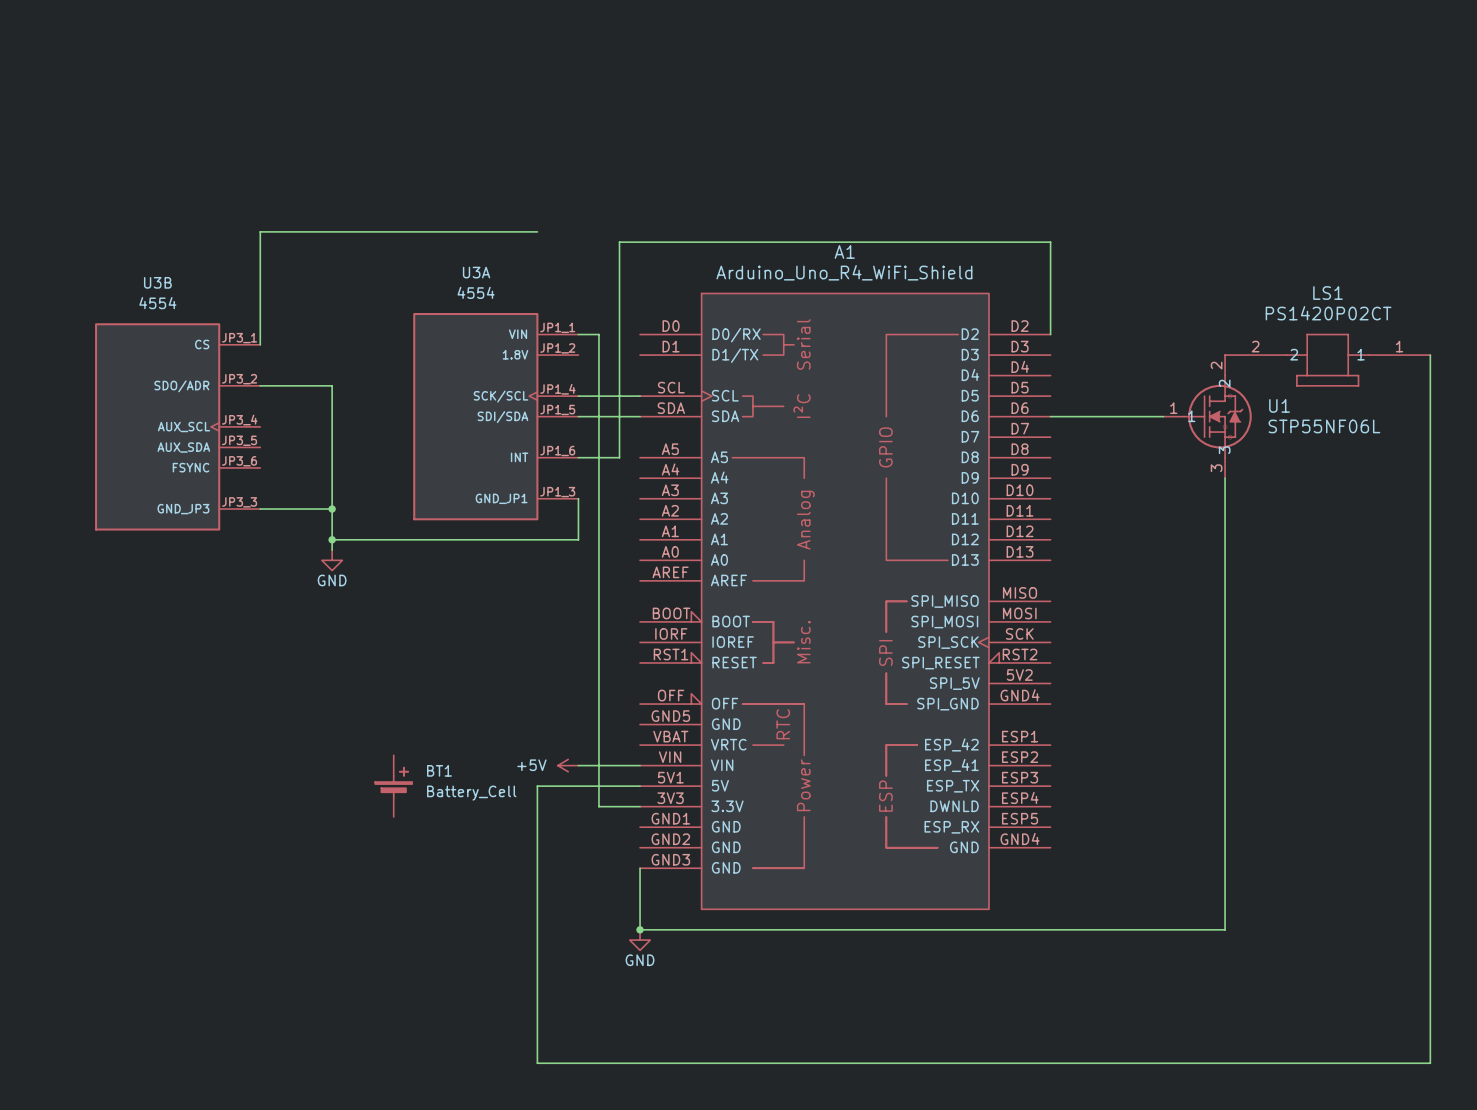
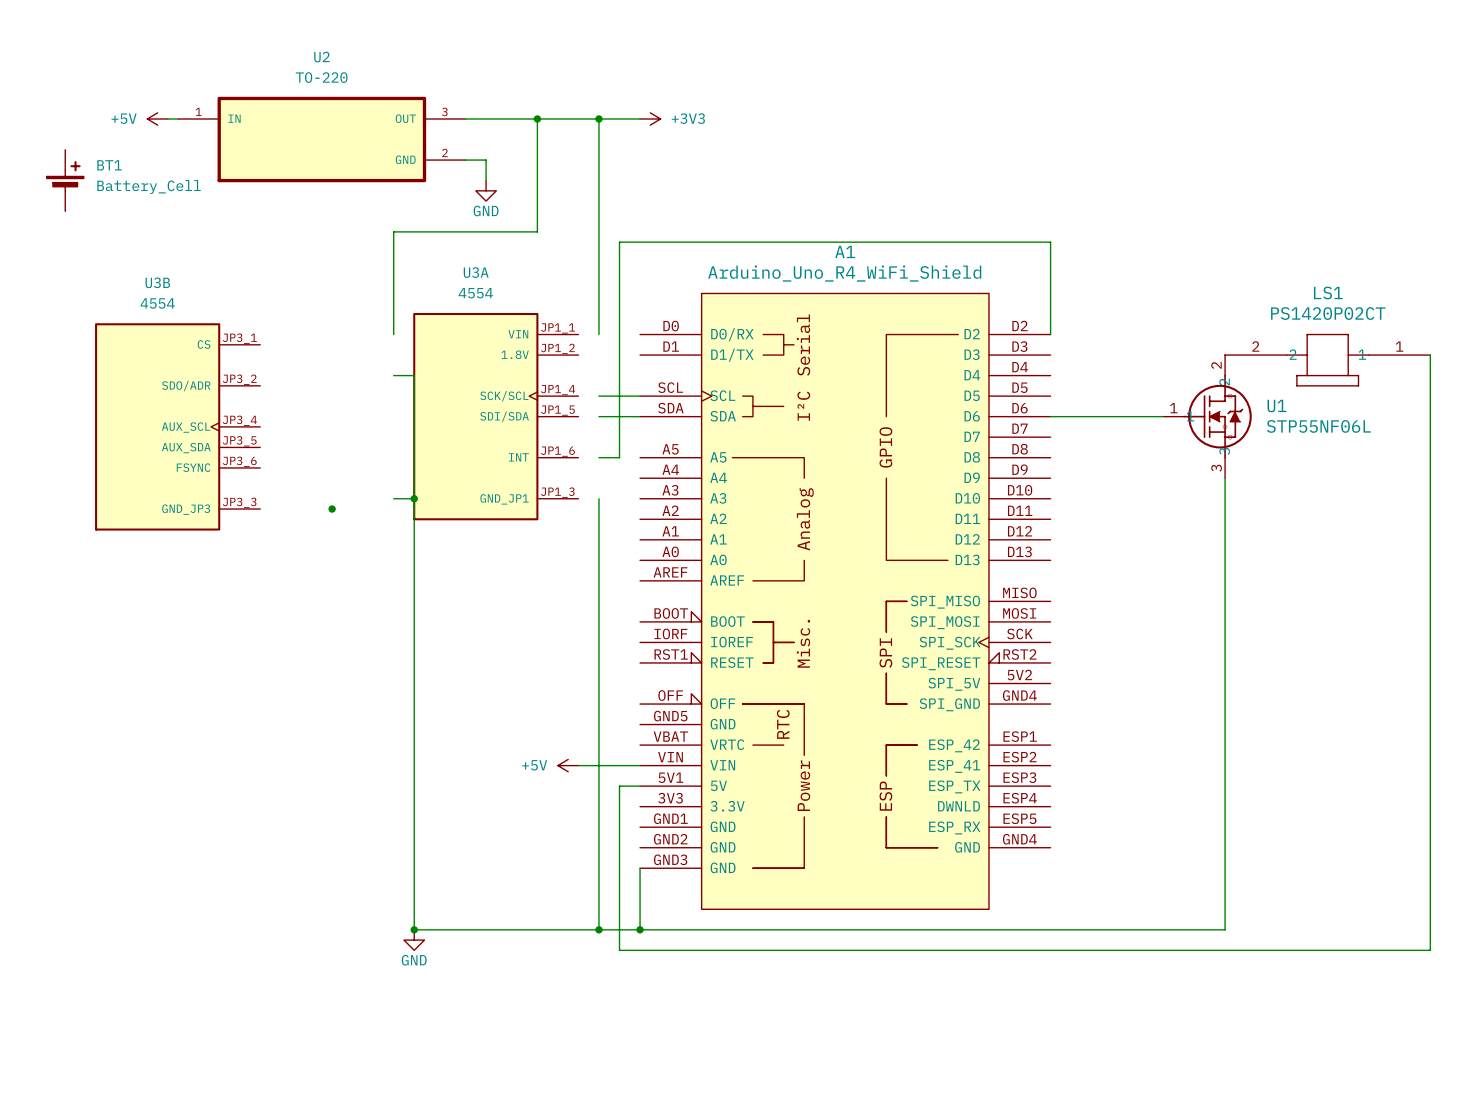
power symbol: none -> +5V (157, 119)
wire: none -> (167, 119) (178, 119)
wire: none -> (465, 119) (640, 119)
wire: none -> (537, 119) (537, 231)
junction: none -> (537, 119)
wire: none -> (598, 119) (598, 334)
junction: none -> (598, 119)
power symbol: none -> +3V3 (650, 119)
U2: none -> TO-220 (321, 139)
wire: none -> (465, 160) (486, 160) (486, 180)
power symbol: none -> GND (486, 190)
wire: (393, 231) (260, 231) (260, 344) -> (393, 231) (393, 334)
wire: (578, 334) (598, 334) (598, 498) -> none
wire: none -> (393, 375) (414, 375) (414, 929) (640, 929)
wire: (260, 385) (332, 385) (332, 550) -> none
wire: (578, 396) (598, 396) -> none
wire: (578, 416) (598, 416) -> none
wire: (578, 457) (598, 457) -> (393, 498) (414, 498)
junction: none -> (414, 498)
wire: (578, 498) (578, 539) (332, 539) -> none
wire: (260, 509) (332, 509) -> none
junction: (332, 539) -> none
power symbol: GND (332, 560) -> none
BT1 position: (393, 786) -> (65, 180)
wire: (619, 786) (537, 786) (537, 1063) (1430, 1063) (1430, 950) -> (619, 786) (619, 950) (1430, 950)
wire: (598, 806) (640, 806) -> (598, 806) (598, 929)
junction: none -> (414, 929)
junction: none -> (598, 929)
power symbol: none -> GND (414, 940)
power symbol: GND (640, 940) -> none

